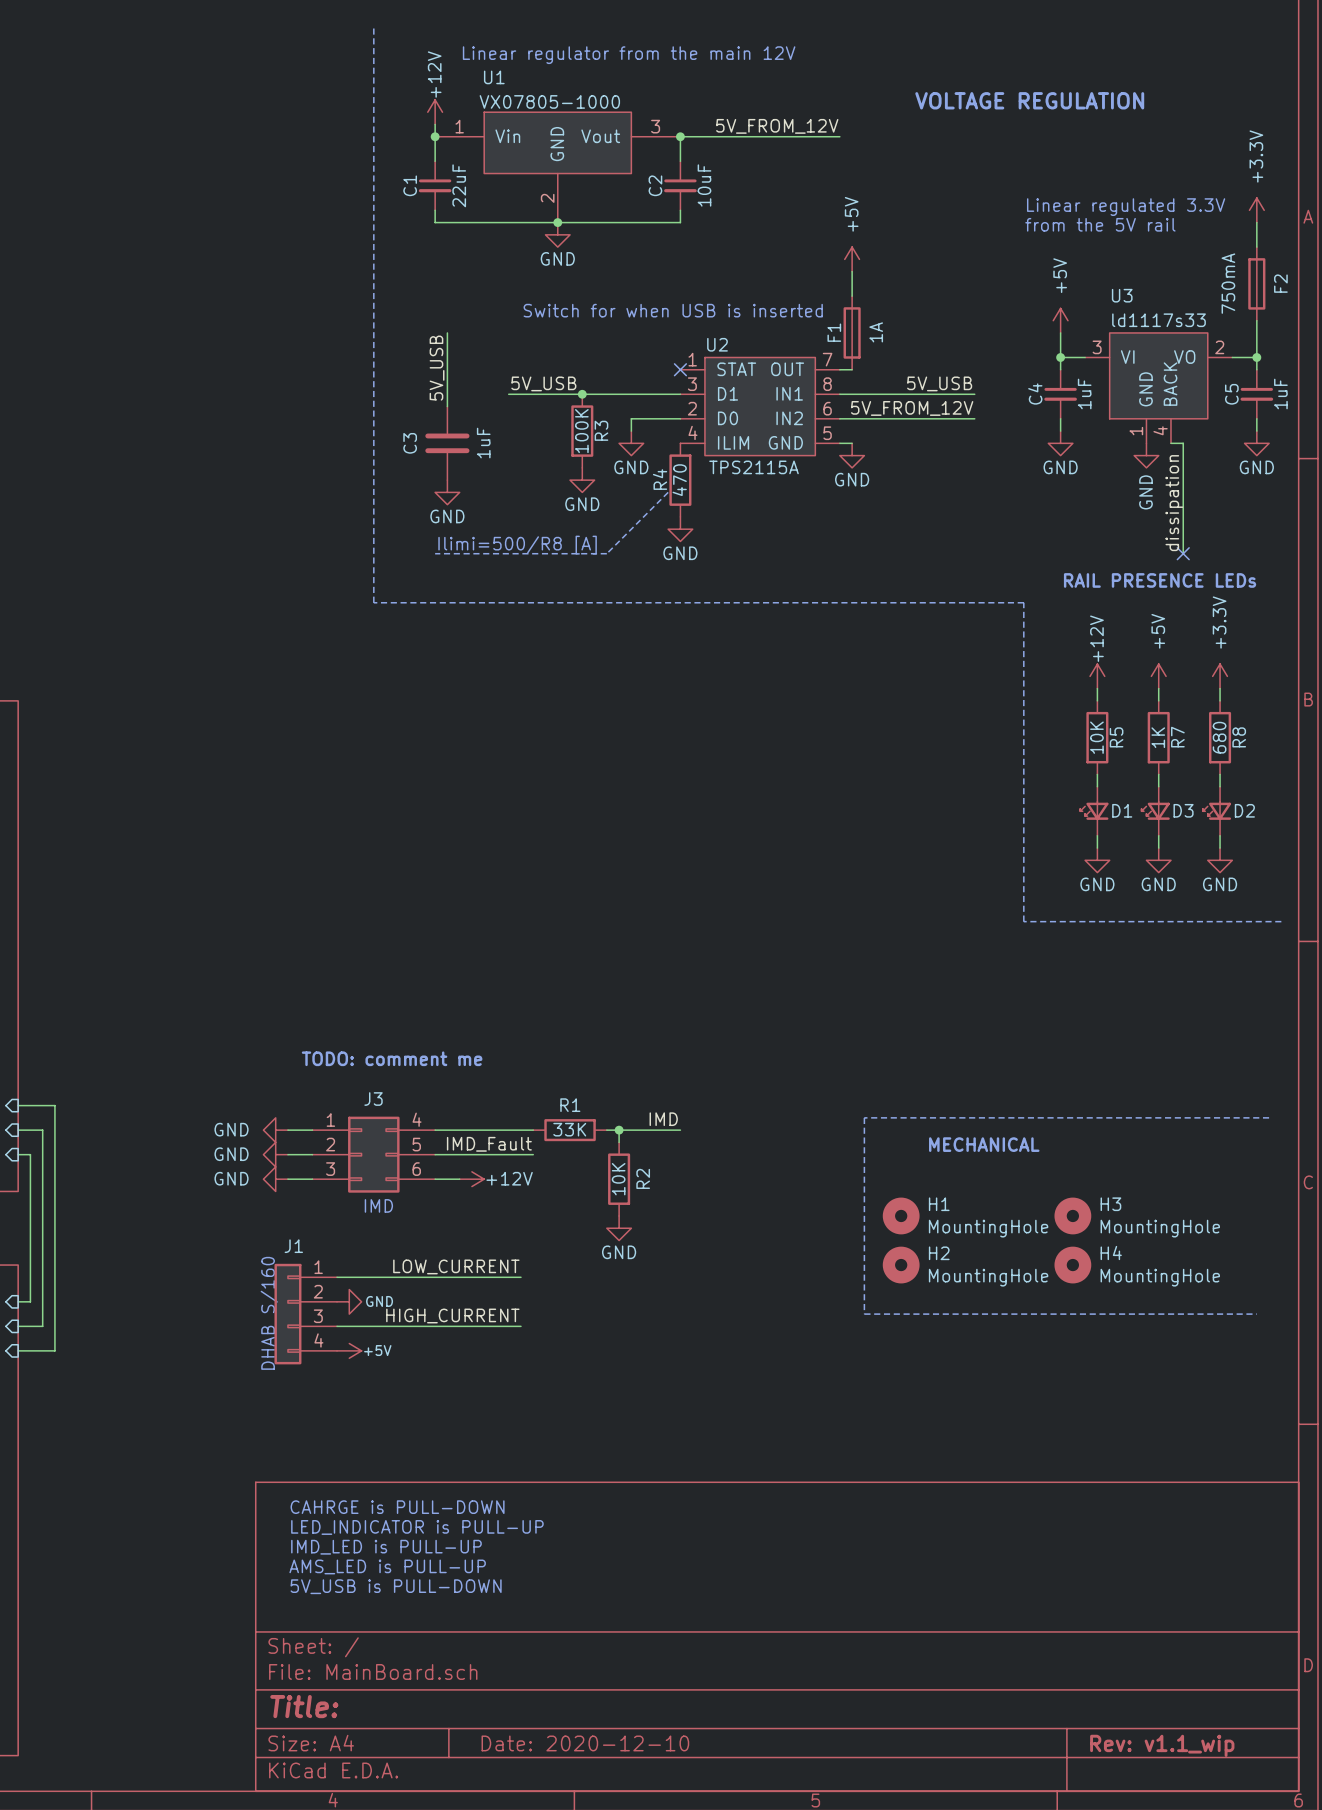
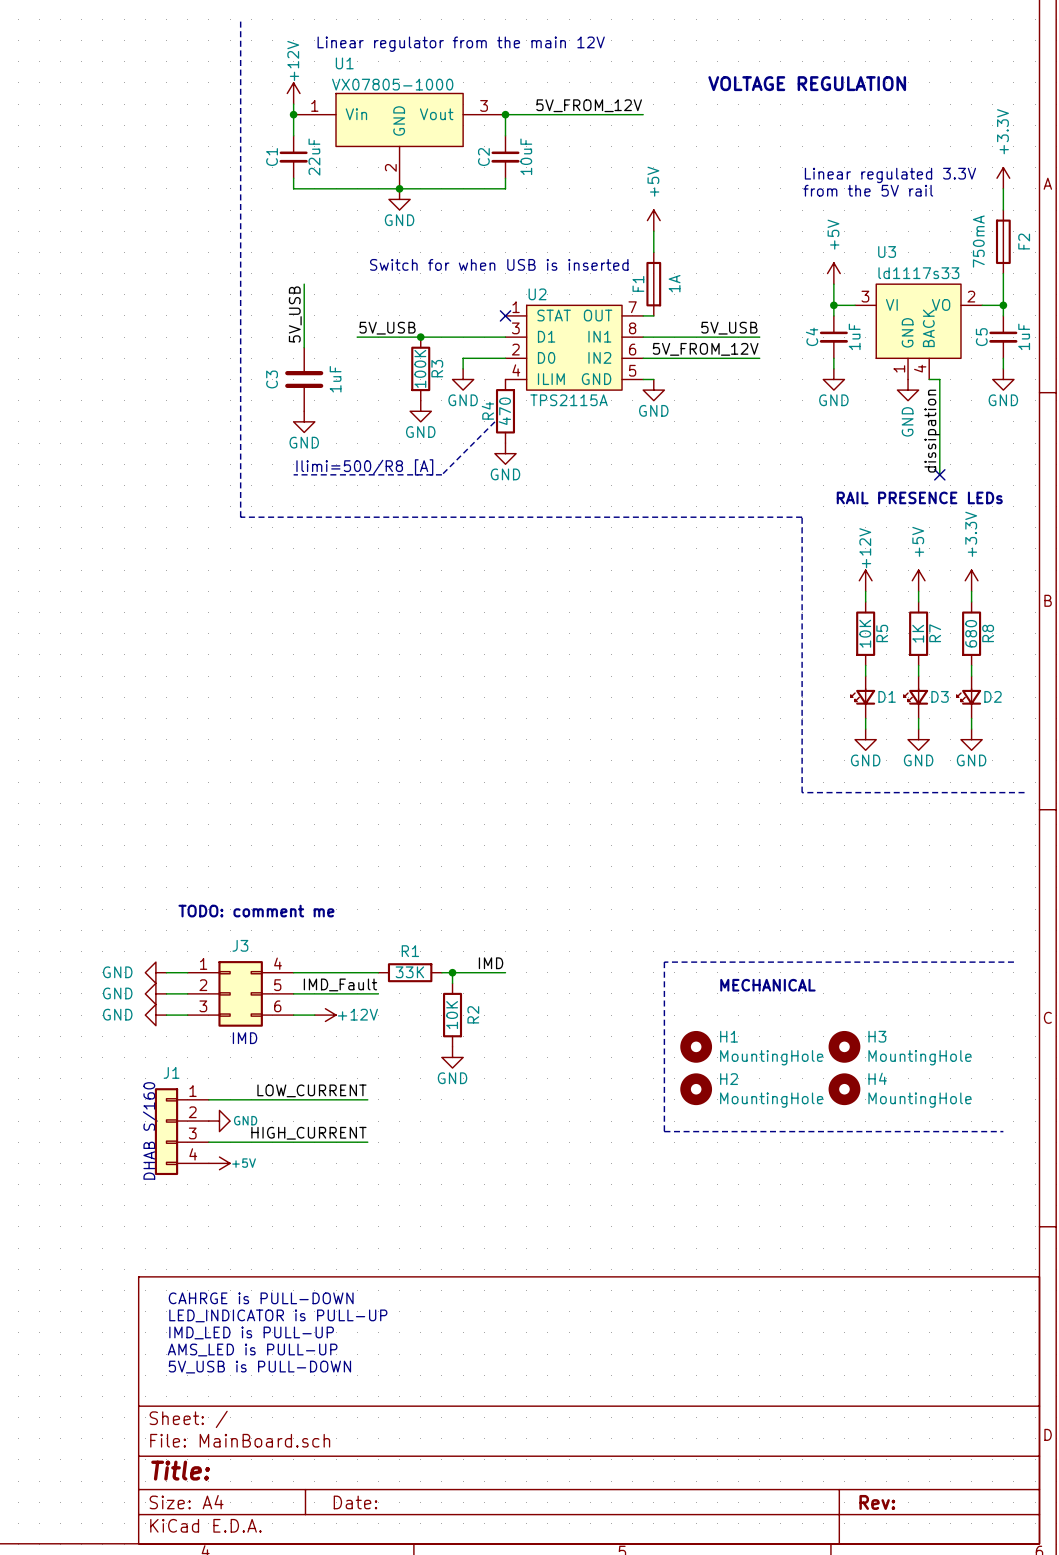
title block: Date: 2020-12-10 (585, 1743) -> Date: (355, 1502)
title block: Rev: v1.1_wip (1162, 1745) -> Rev: (877, 1502)

